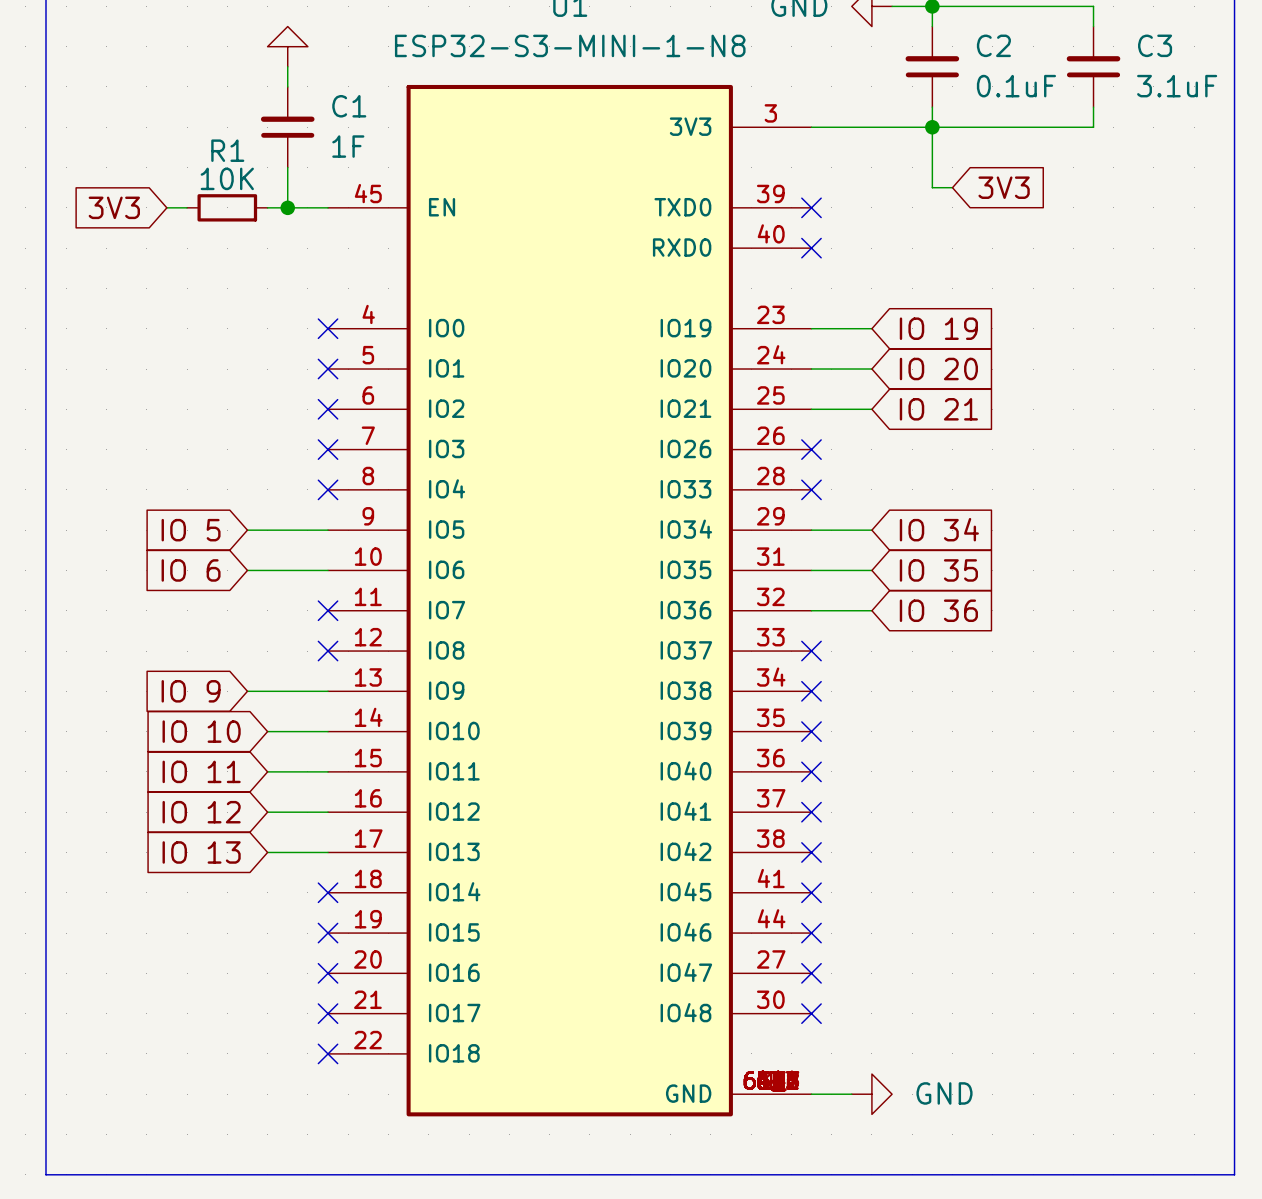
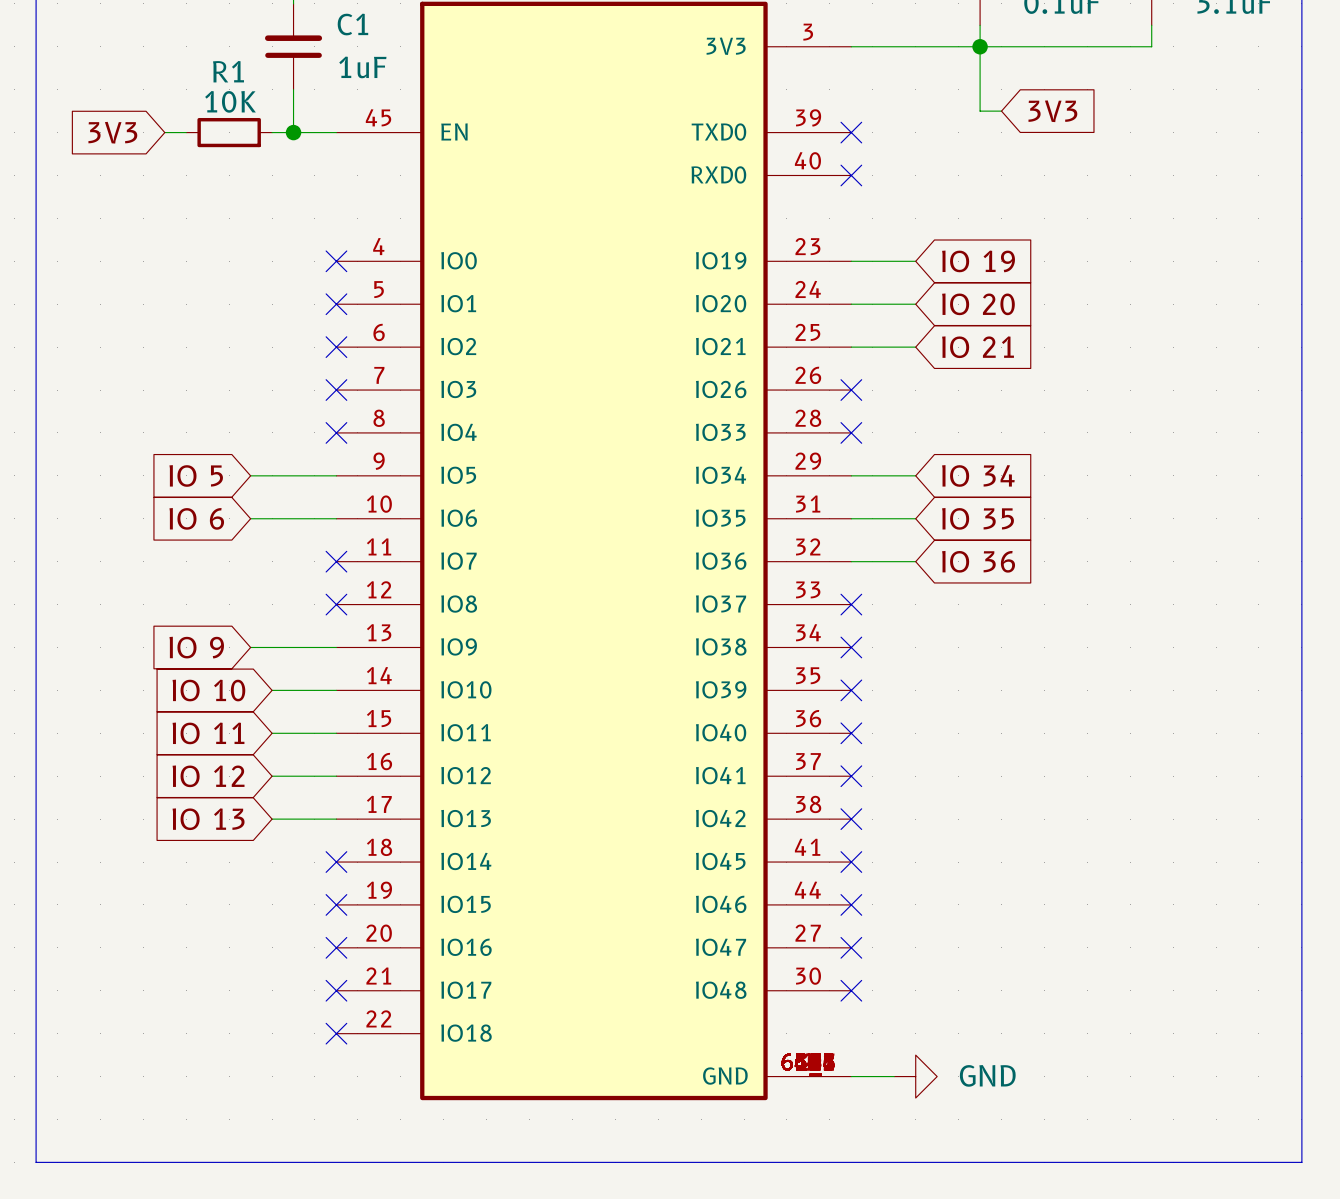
C1 value: 1F (348, 146) -> 1uF (362, 67)

